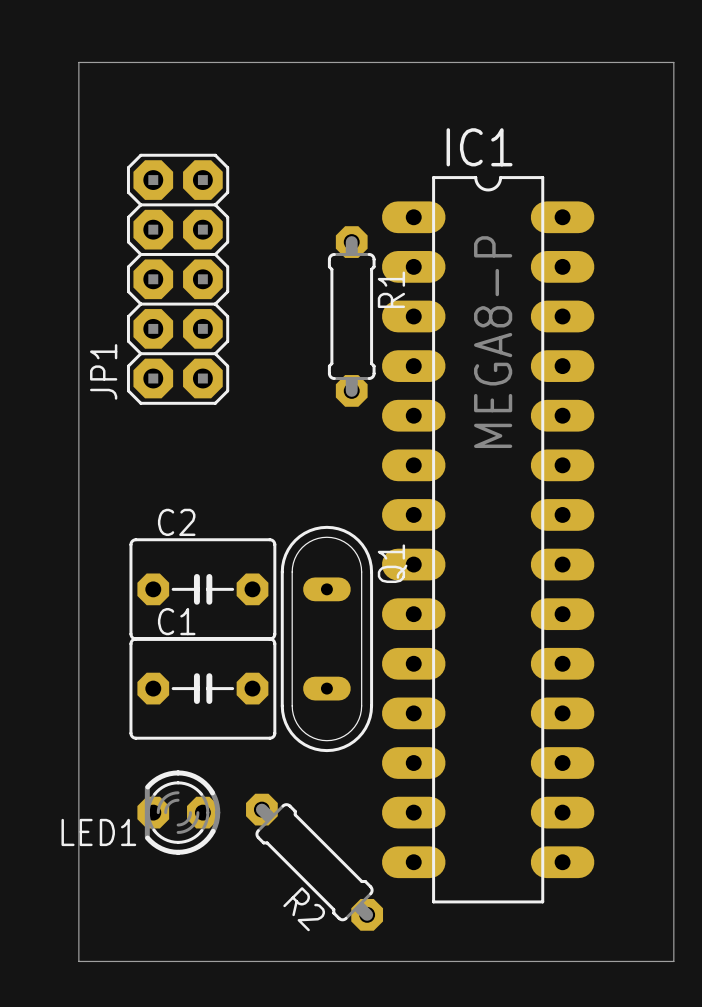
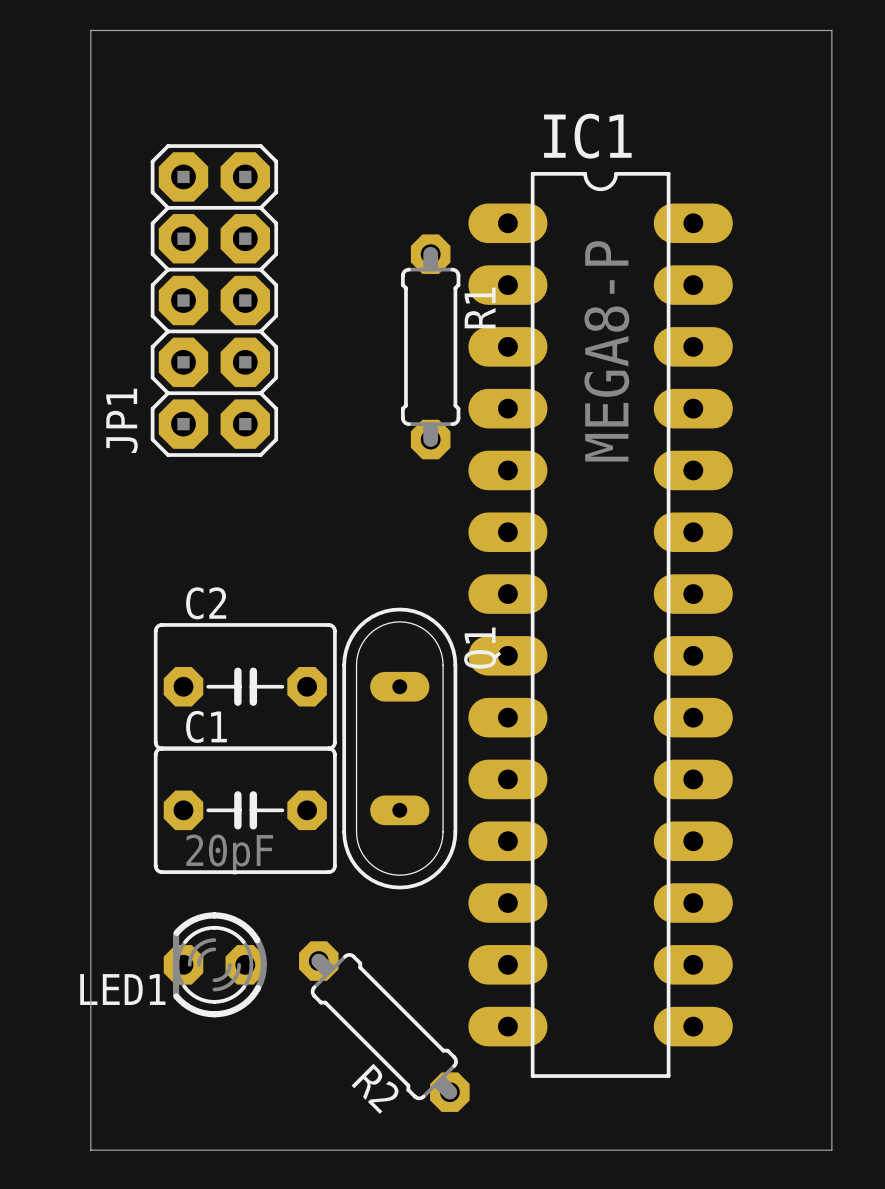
C1 value: none -> 20pF (229, 854)

